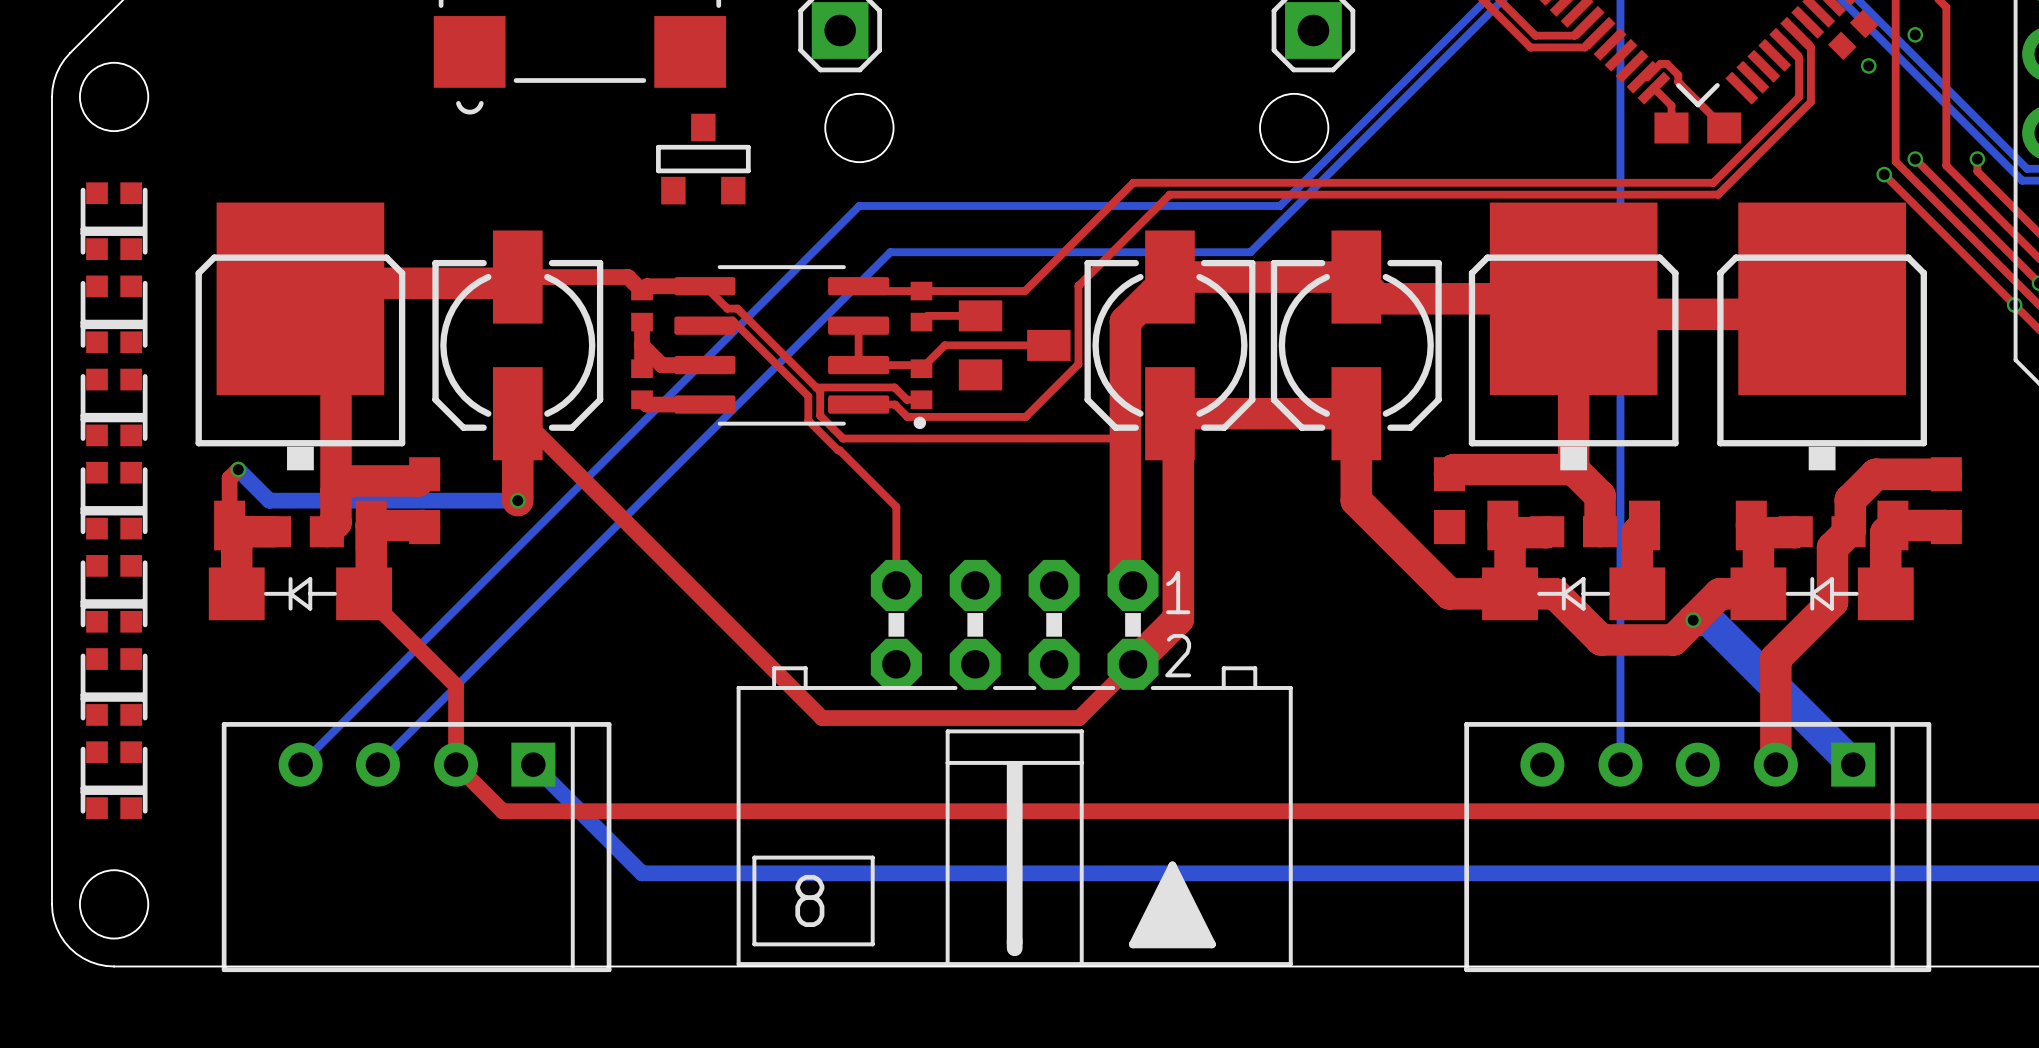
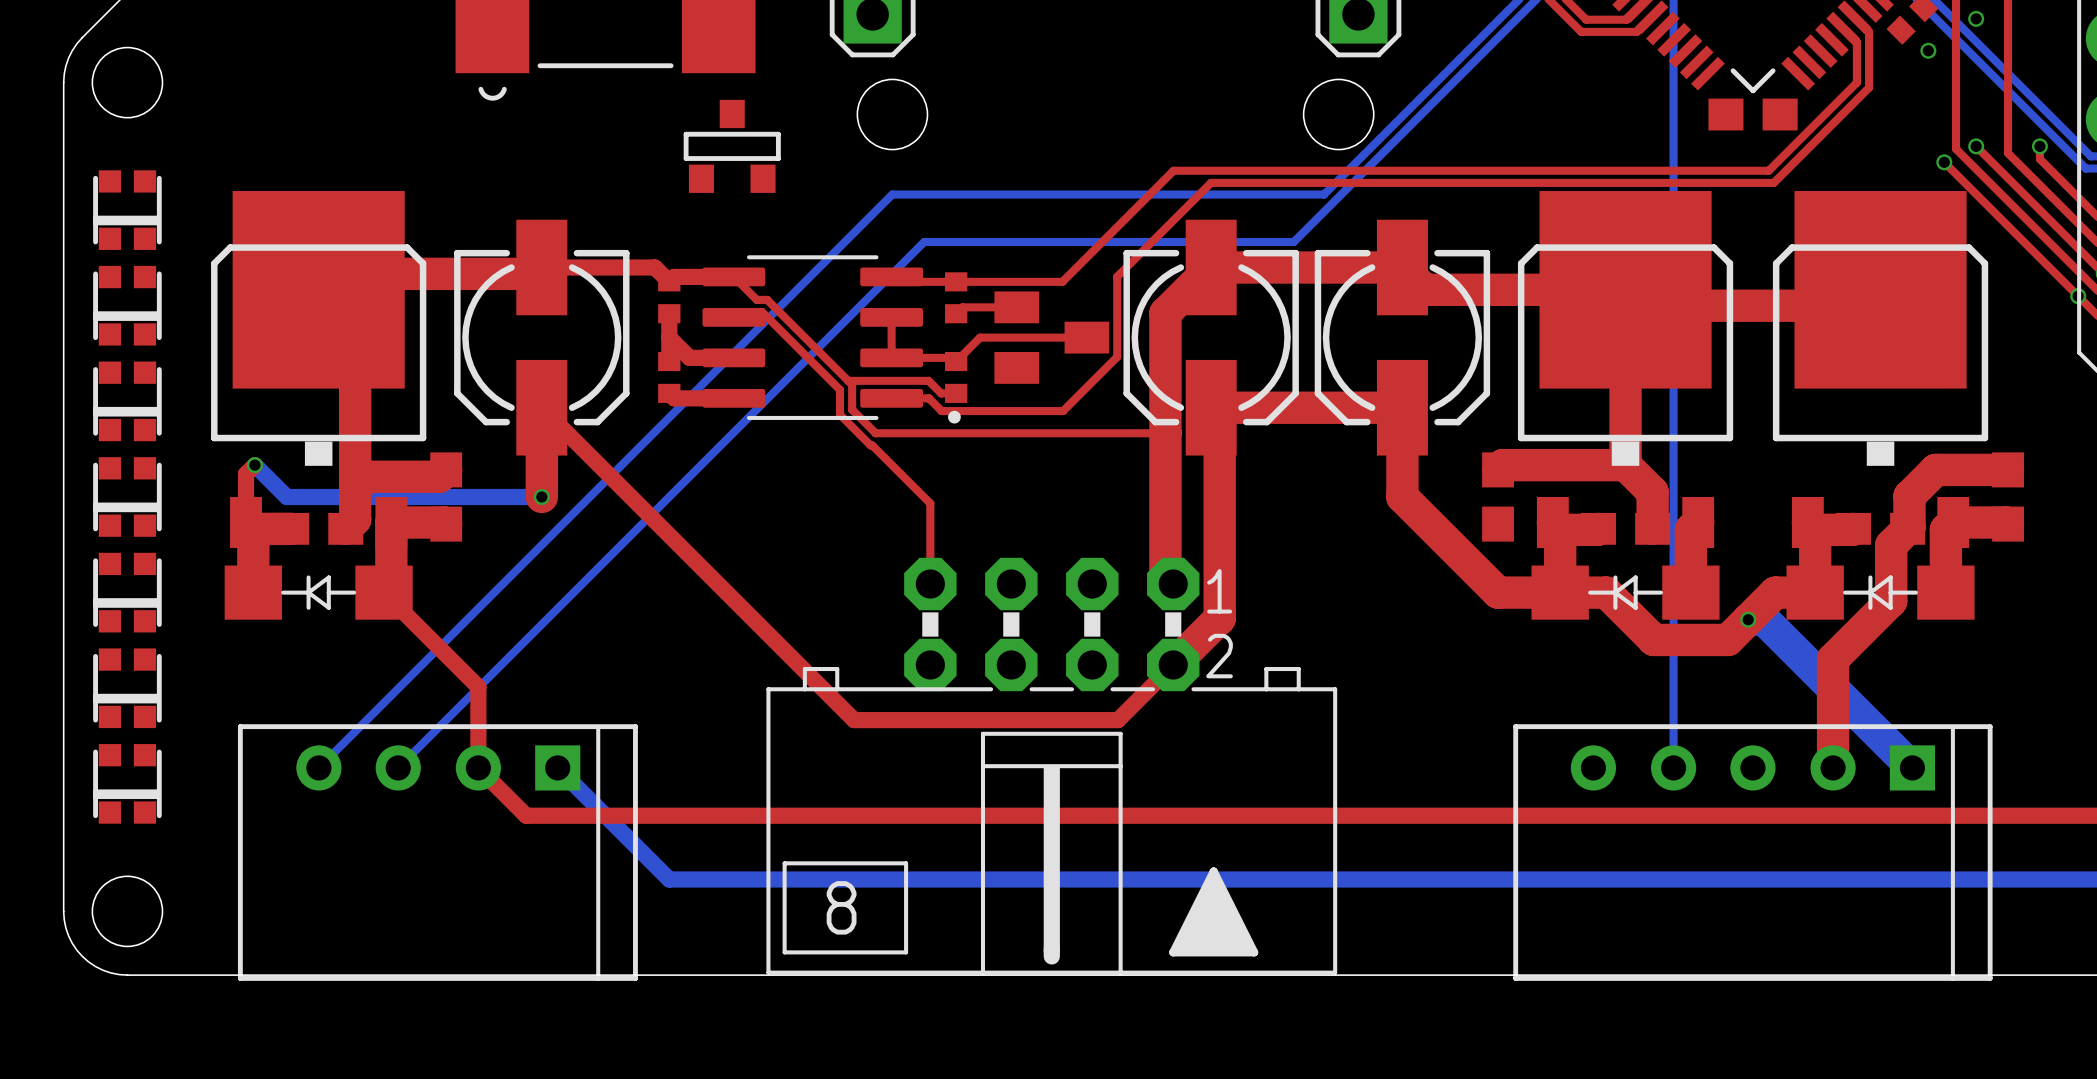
top track: (1643, 77) (1647, 77) (1660, 63) (1667, 63) (1678, 75) (1678, 82) (1724, 128) -> none
top track: (1653, 88) (1671, 105) (1671, 128) -> none

